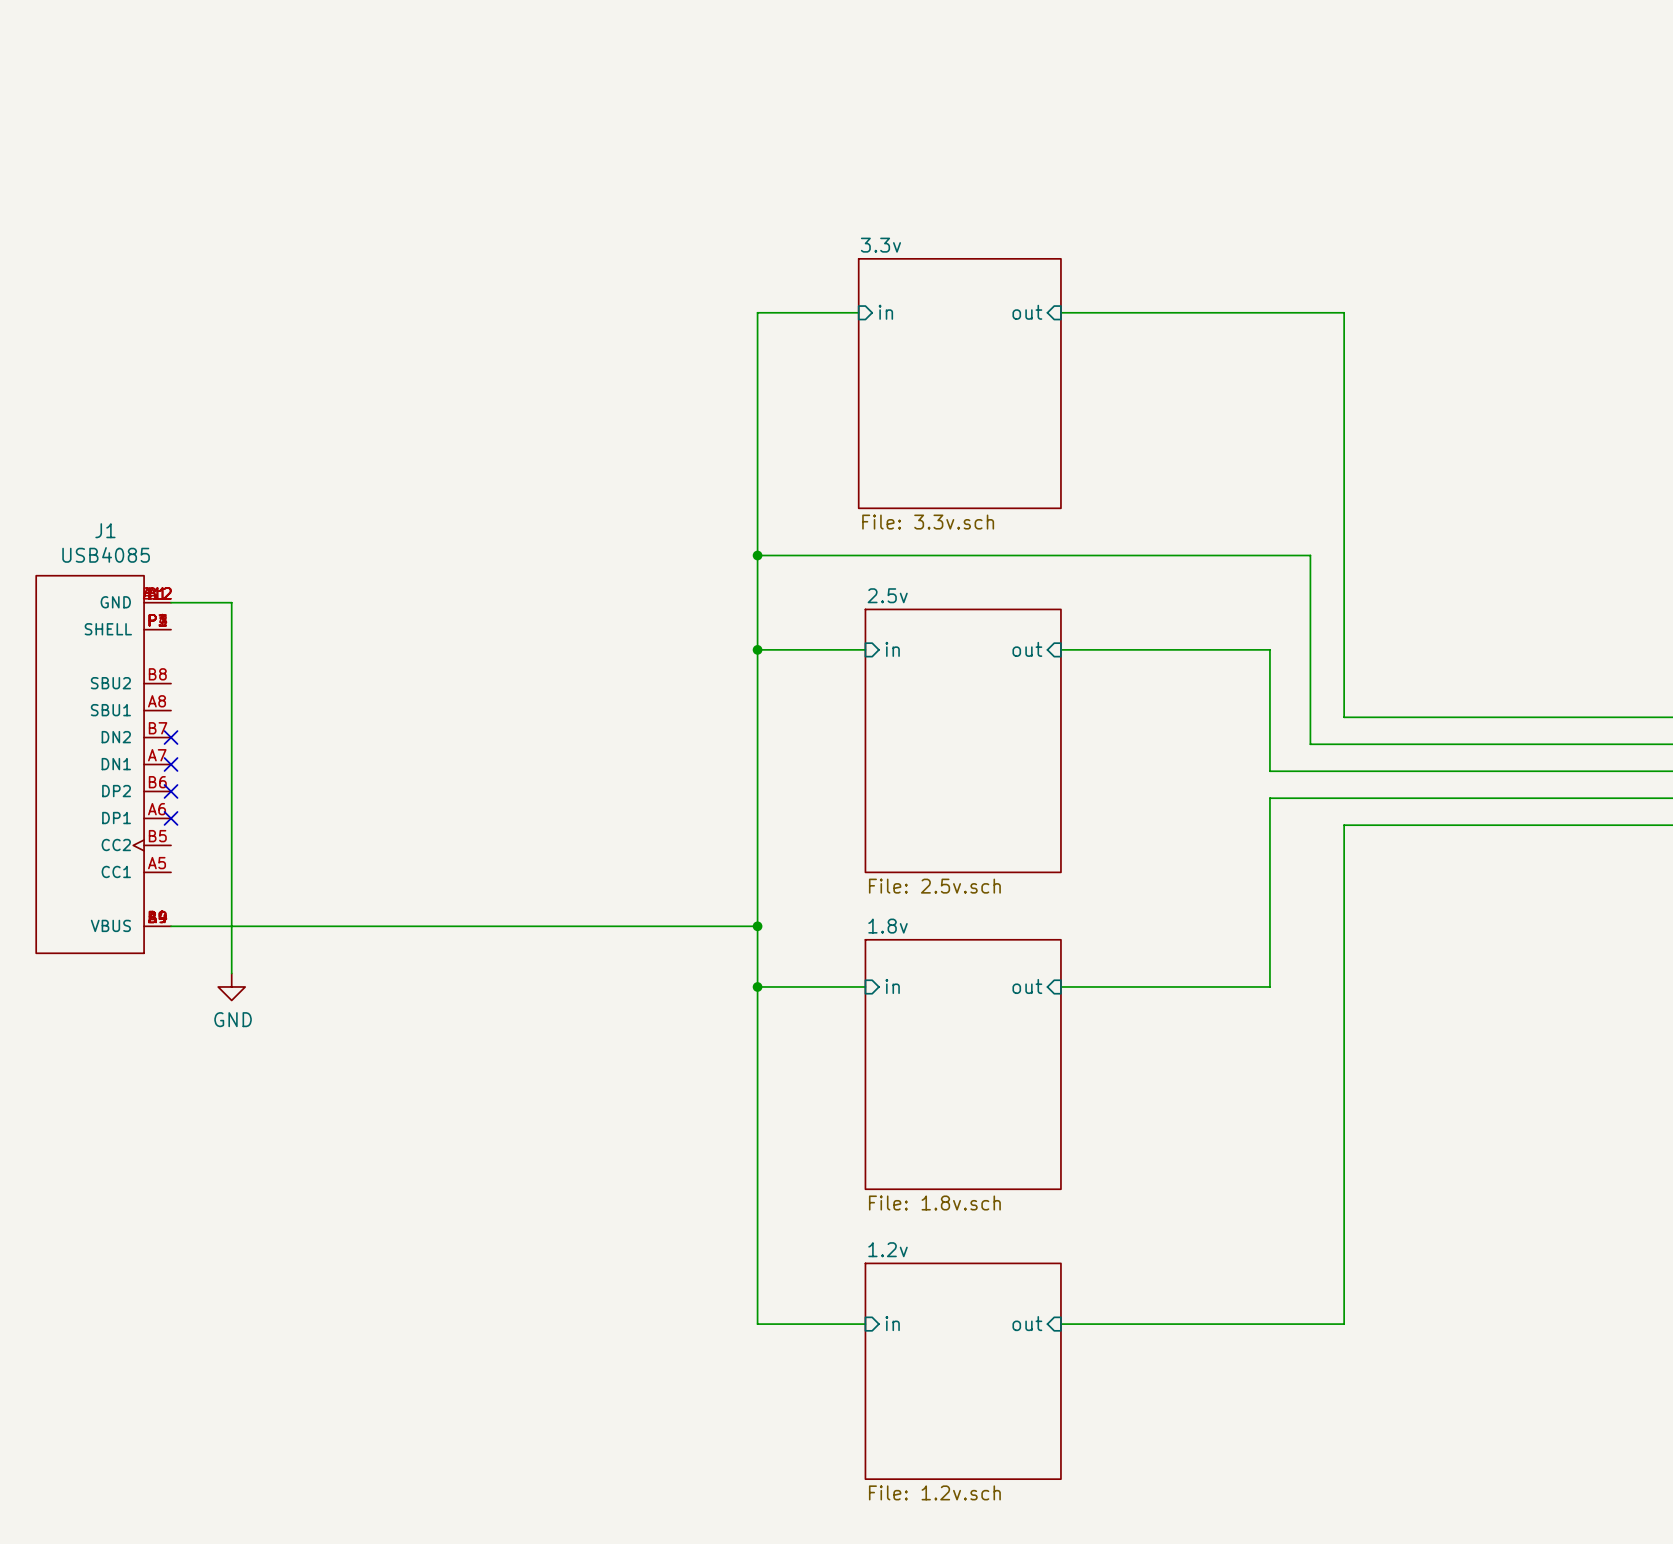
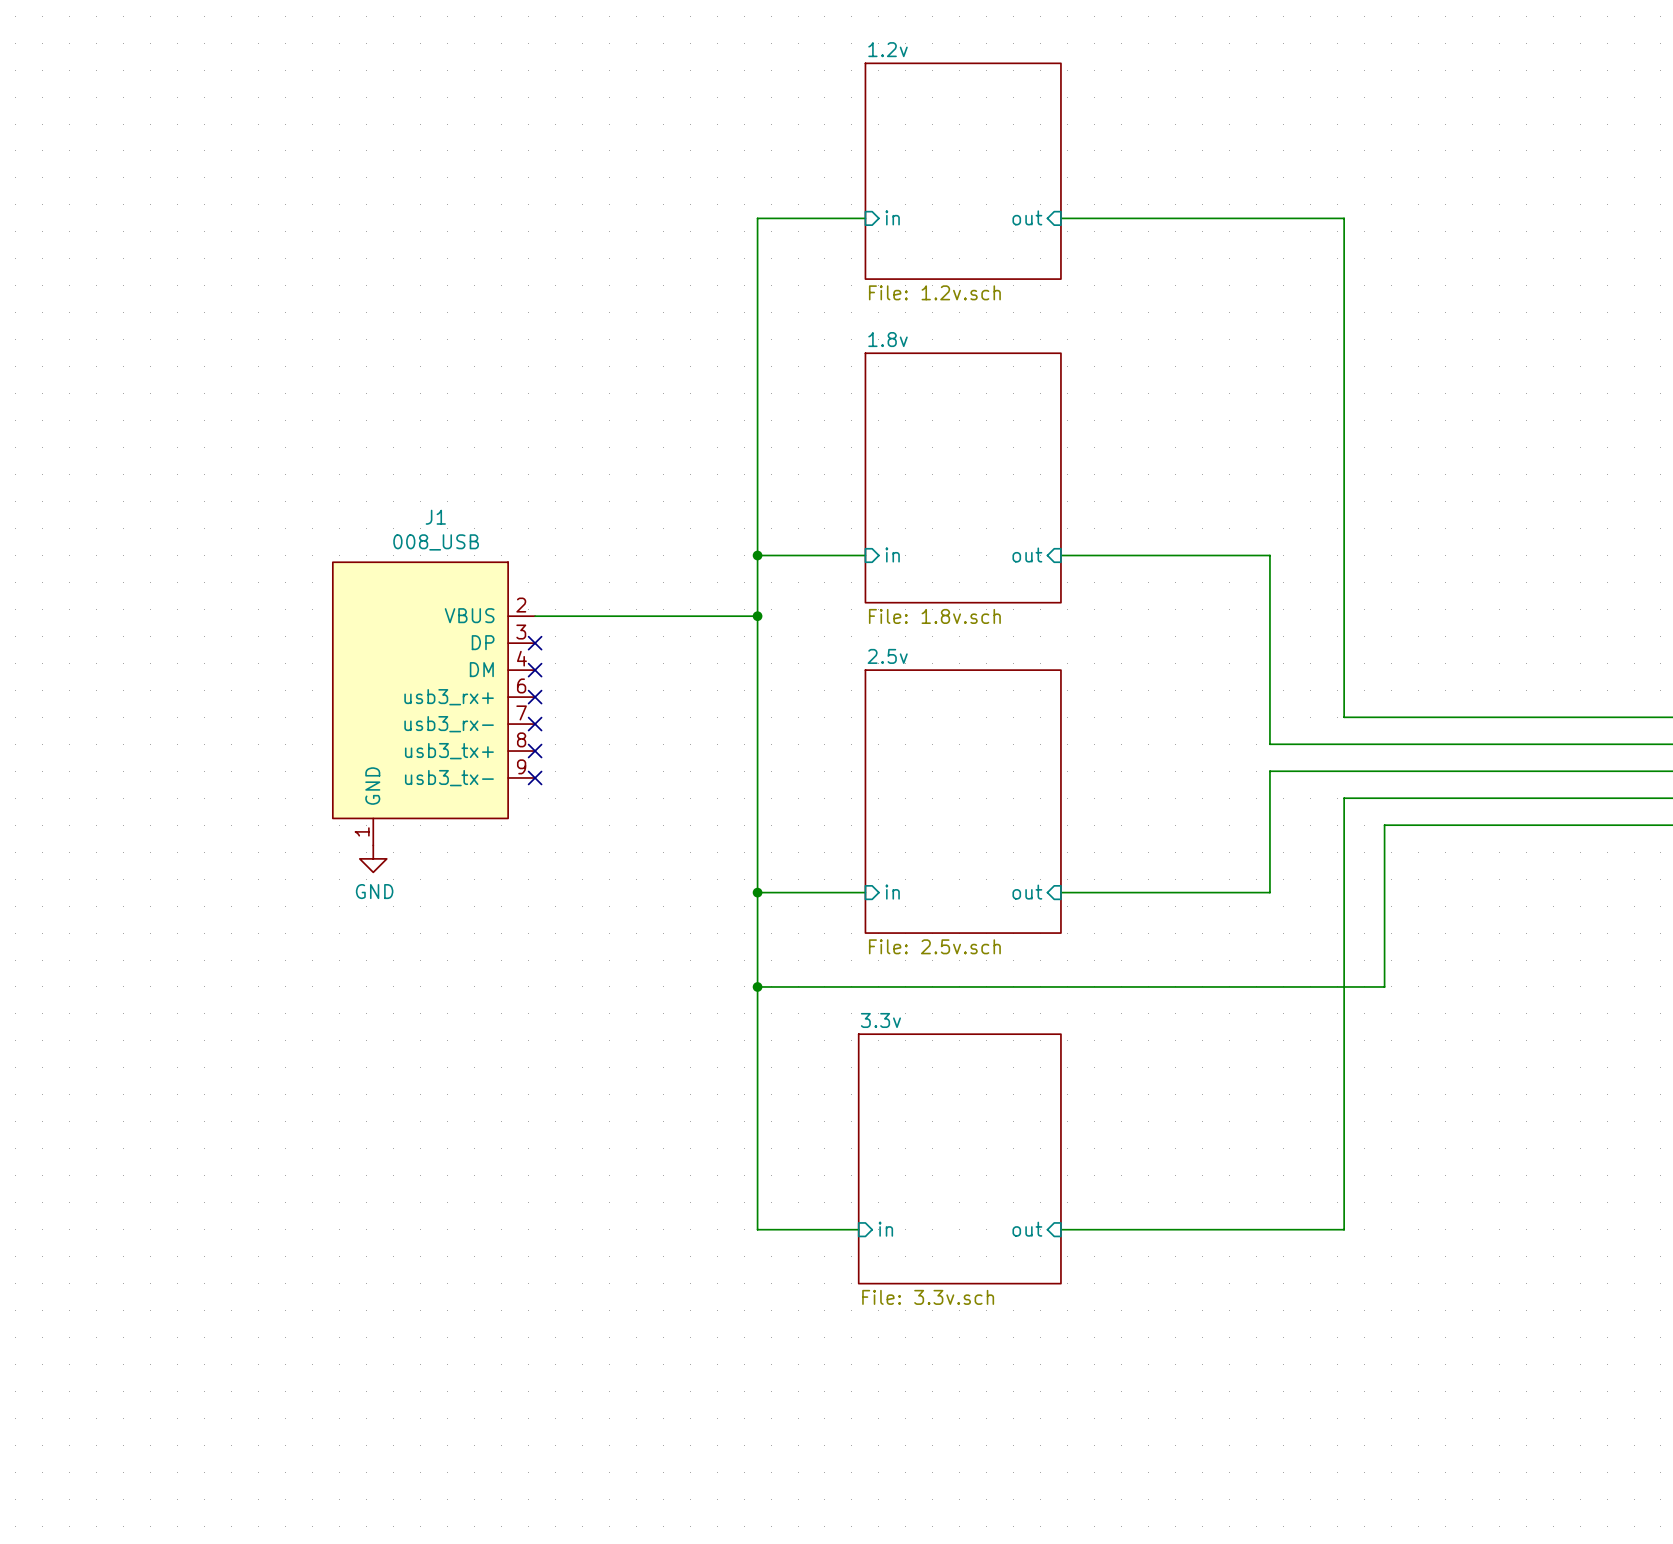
wire: (757, 312) (858, 312) -> (757, 312) (757, 218) (865, 218)
sheet pin position: in (885, 312) -> in (892, 217)
sheet pin position: out (1027, 312) -> out (1027, 217)
wire: (1060, 312) (1344, 312) -> (1060, 218) (1344, 218) (1344, 312)
sheet 3.3v position: (959, 383) -> (959, 1158)
J1 name position: J1 (105, 530) -> J1 (435, 517)
J1 value: USB4085 (106, 554) -> 008_USB (436, 542)
wire: (865, 555) (1060, 555) -> none
wire: (1269, 555) (1310, 555) (1310, 744) -> (1269, 555) (1269, 649)
J1 symbol: [36, 575, 172, 954] -> [332, 562, 536, 846]
wire: (171, 602) (231, 602) (231, 973) -> none
wire: none -> (535, 616) (757, 616)
no-connect mark: none -> (535, 643)
wire: (757, 649) (865, 649) -> (757, 892) (865, 892)
junction position: (757, 649) -> (757, 616)
sheet pin position: in (892, 649) -> in (892, 554)
sheet pin position: out (1027, 649) -> out (1027, 554)
wire: (1060, 649) (1269, 649) -> (1060, 892) (1269, 892)
no-connect mark: none -> (535, 670)
no-connect mark: none -> (535, 697)
no-connect mark: none -> (535, 724)
no-connect mark: (171, 737) -> none
sheet 2.5v position: (963, 740) -> (963, 801)
wire: (1269, 744) (1269, 771) -> (1269, 744) (1310, 744)
no-connect mark: none -> (535, 751)
no-connect mark: (171, 764) -> none
no-connect mark: none -> (535, 777)
no-connect mark: (171, 791) -> none
wire: (1269, 798) (1344, 798) -> (1269, 798) (1269, 771)
no-connect mark: (171, 818) -> none
wire: (1344, 825) (1384, 825) -> (1344, 825) (1344, 798)
wire: (1269, 892) (1269, 986) -> (1384, 825) (1384, 986) (1269, 986)
wire: (171, 926) (757, 926) -> none
junction position: (757, 926) -> (757, 892)
power symbol position: GND (231, 986) -> GND (373, 858)
wire: none -> (865, 986) (1060, 986)
sheet pin position: in (892, 986) -> in (892, 892)
sheet pin position: out (1027, 986) -> out (1027, 892)
sheet 1.8v position: (963, 1064) -> (963, 477)
wire: (757, 1229) (757, 1324) (865, 1324) -> (757, 1229) (858, 1229)
wire: (1344, 1229) (1344, 1324) (1060, 1324) -> (1344, 1229) (1060, 1229)
sheet pin position: in (892, 1323) -> in (885, 1229)
sheet pin position: out (1027, 1323) -> out (1027, 1229)
sheet 1.2v position: (963, 1371) -> (963, 171)

